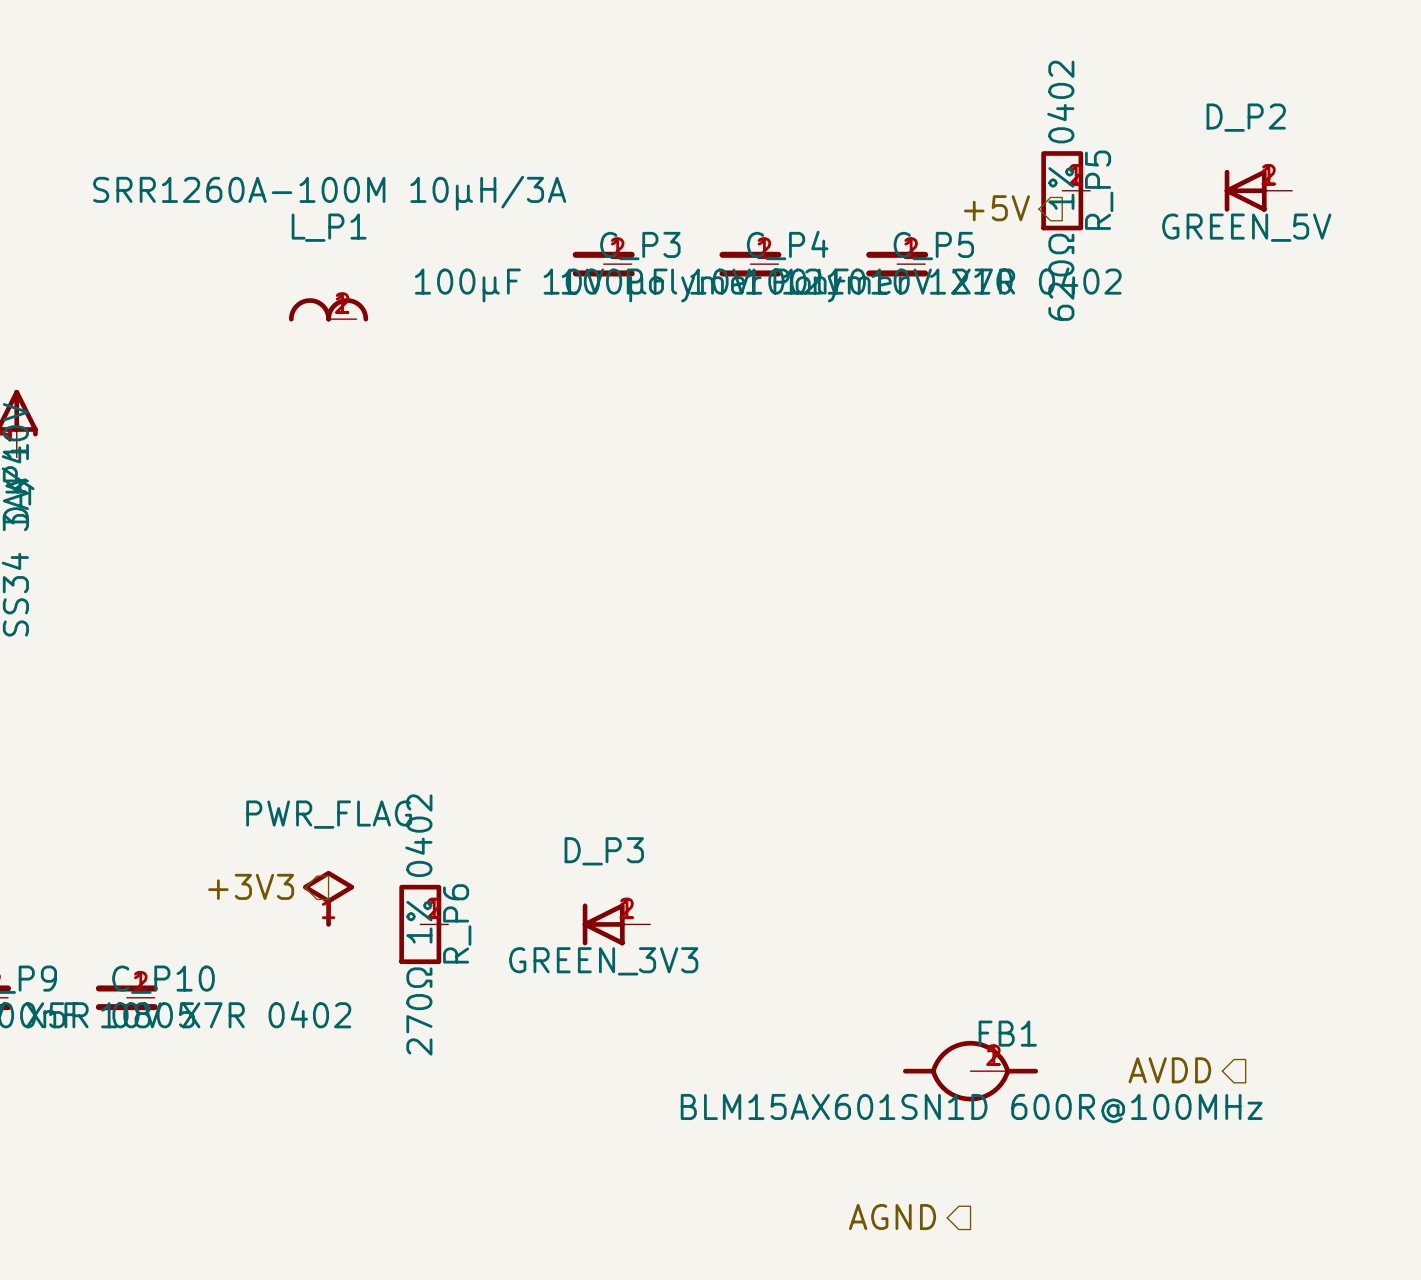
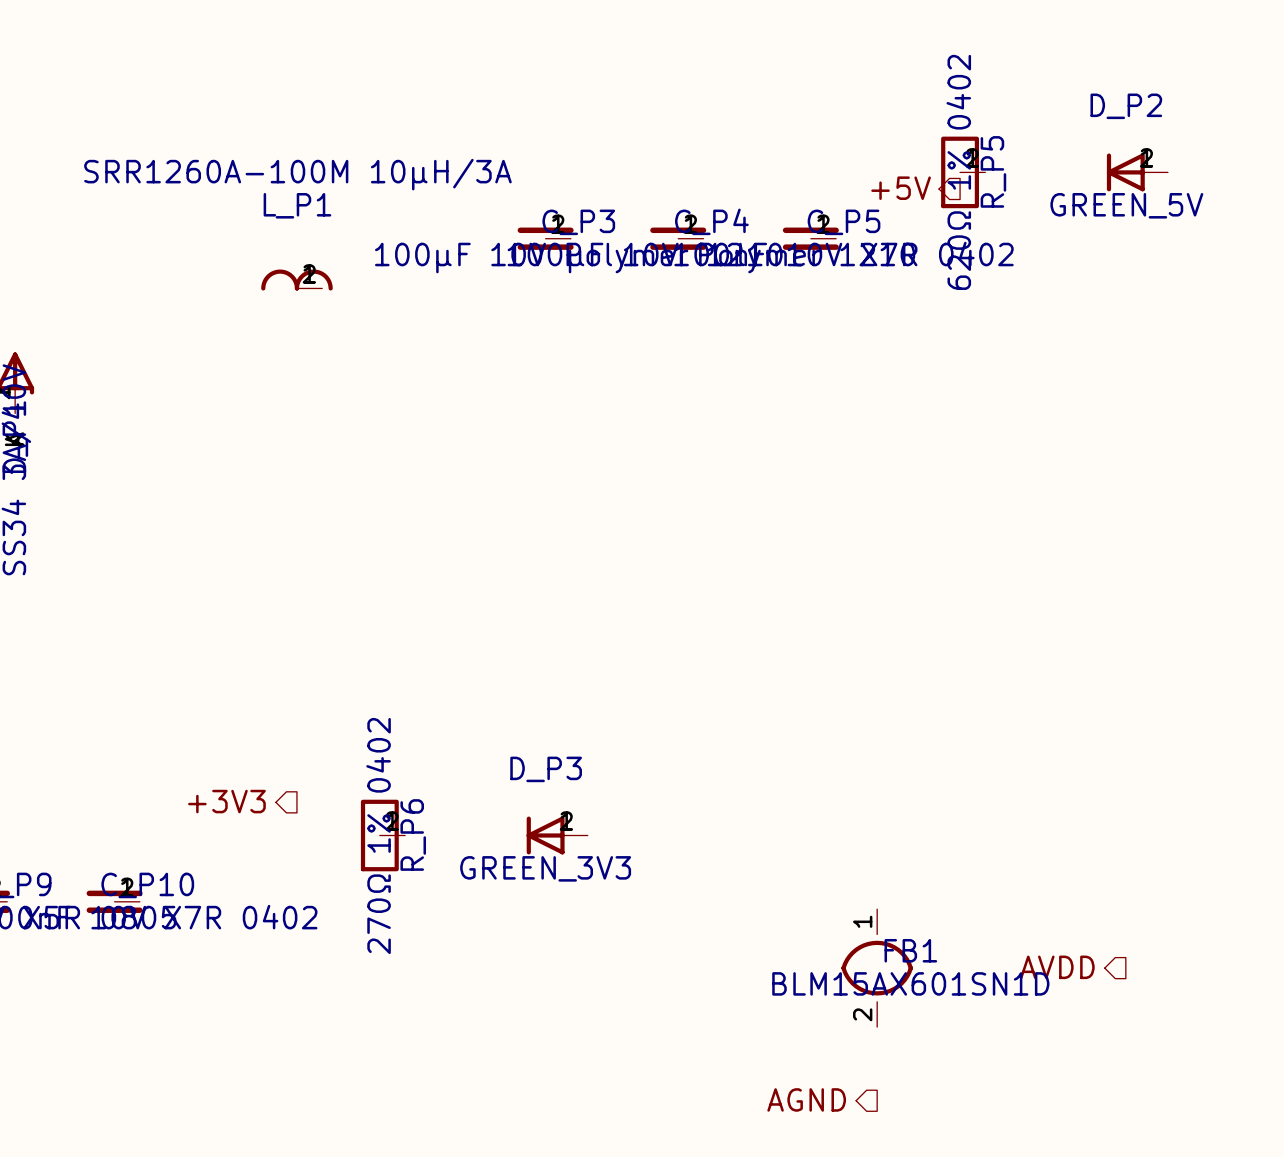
power symbol: PWR_FLAG (328, 898) -> none
FB1 symbol: [902, 1040, 1039, 1102] -> [841, 909, 913, 1028]
FB1 value: BLM15AX601SN1D 600R@100MHz (971, 1108) -> BLM15AX601SN1D (910, 983)

